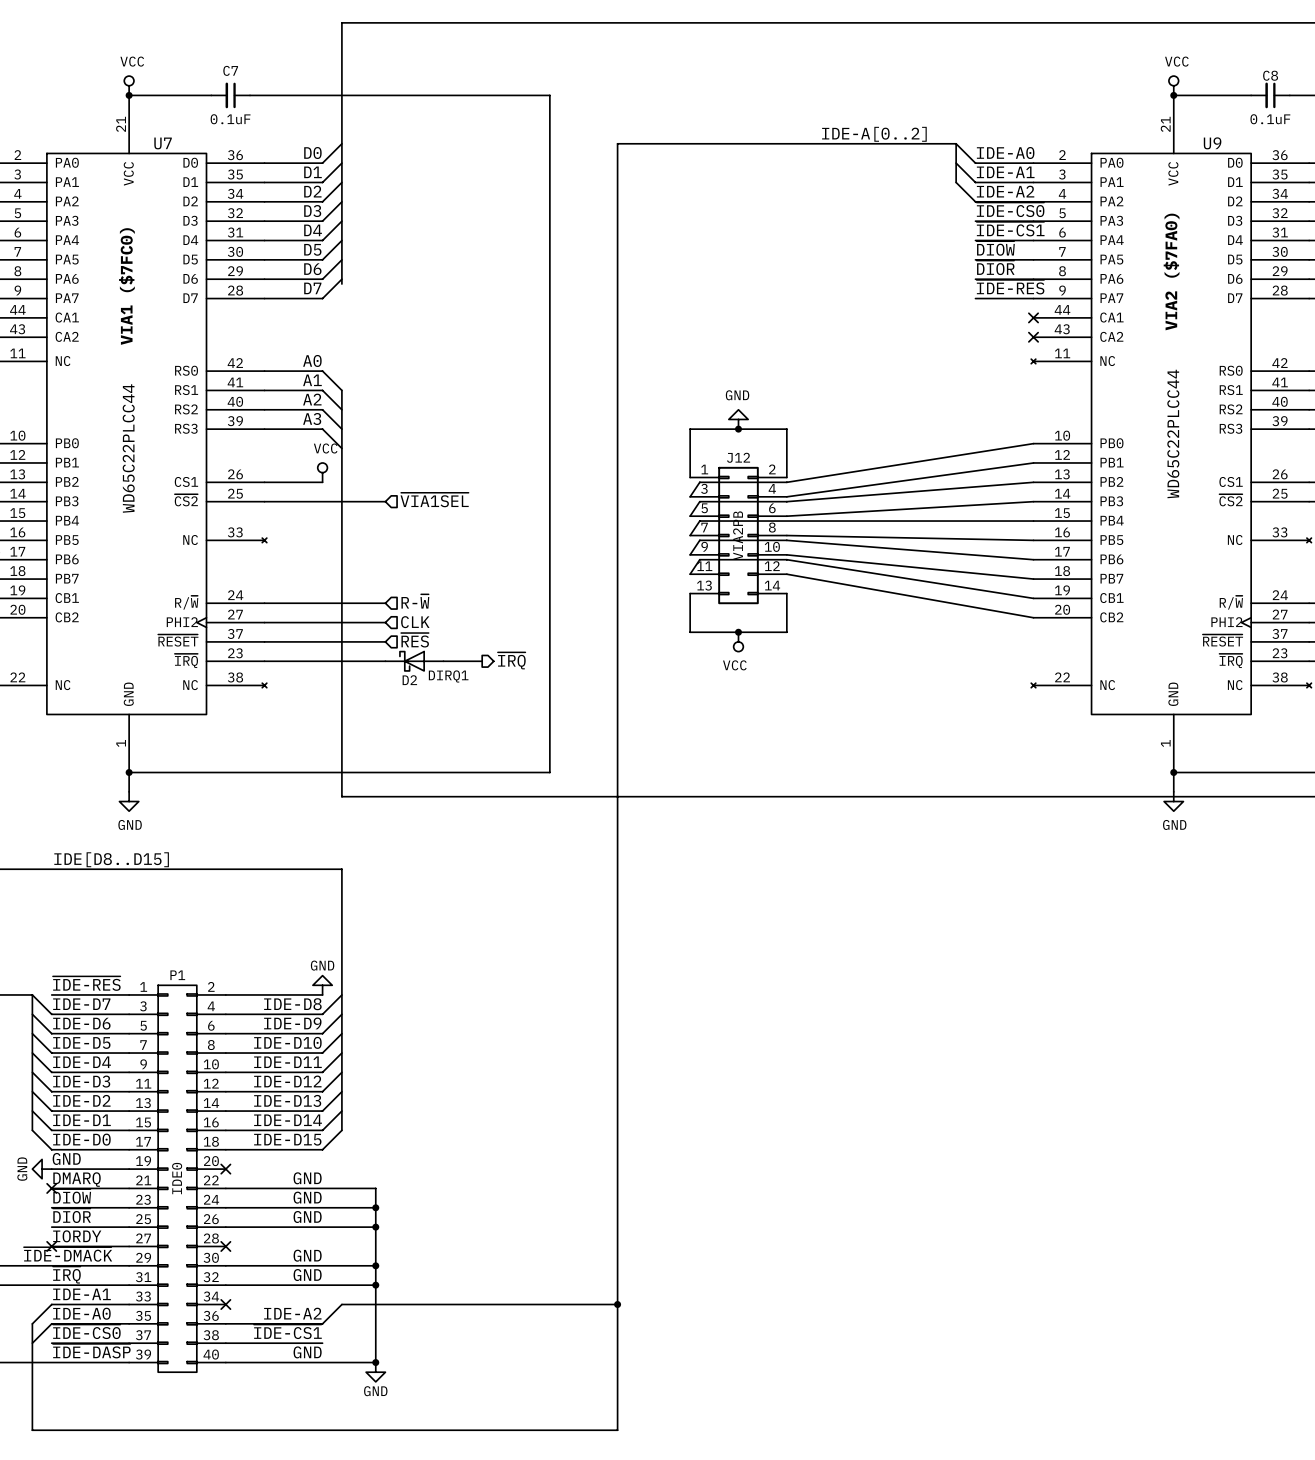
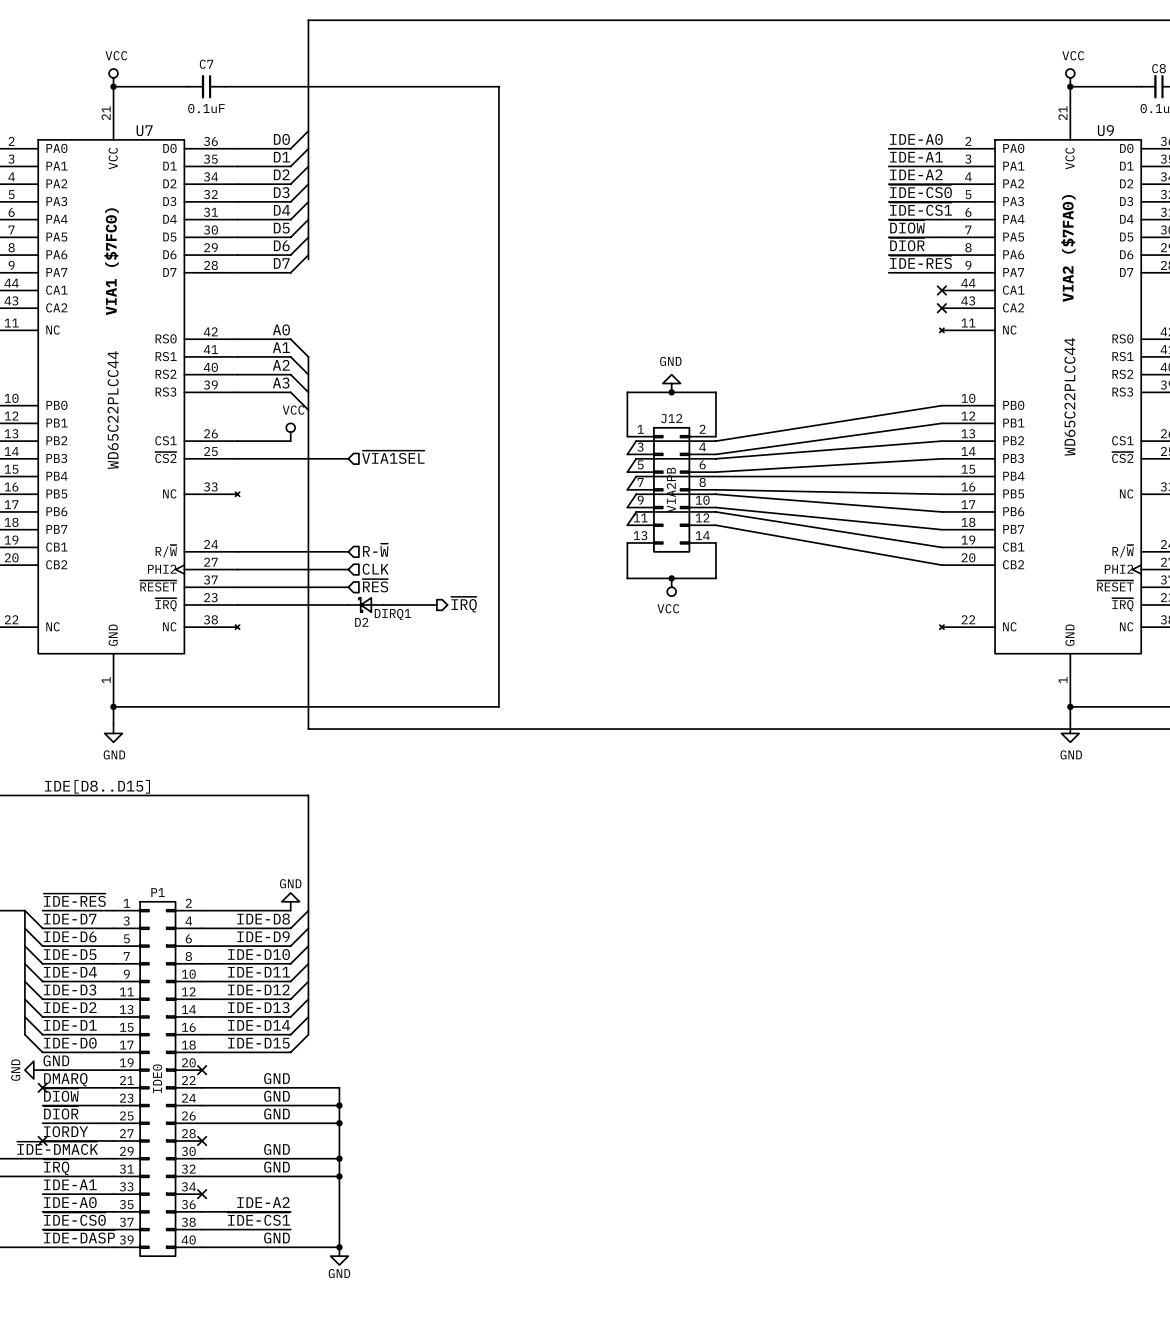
label: IDE-A[0..2] (874, 134) -> none
wire: (956, 143) (975, 163) -> none
wire: (956, 163) (975, 182) -> none
wire: (956, 182) (975, 201) -> none
bus: (956, 182) (956, 143) (617, 143) (617, 1430) (32, 1430) (32, 1323) -> none
D2 symbol: [385, 650, 444, 672] -> [348, 597, 384, 613]
wire: (51, 1304) (32, 1323) -> none
wire: (341, 1304) (322, 1323) -> none
bus: (341, 1304) (617, 1304) -> none
junction: (617, 1304) -> none
wire: (51, 1323) (32, 1343) -> none

